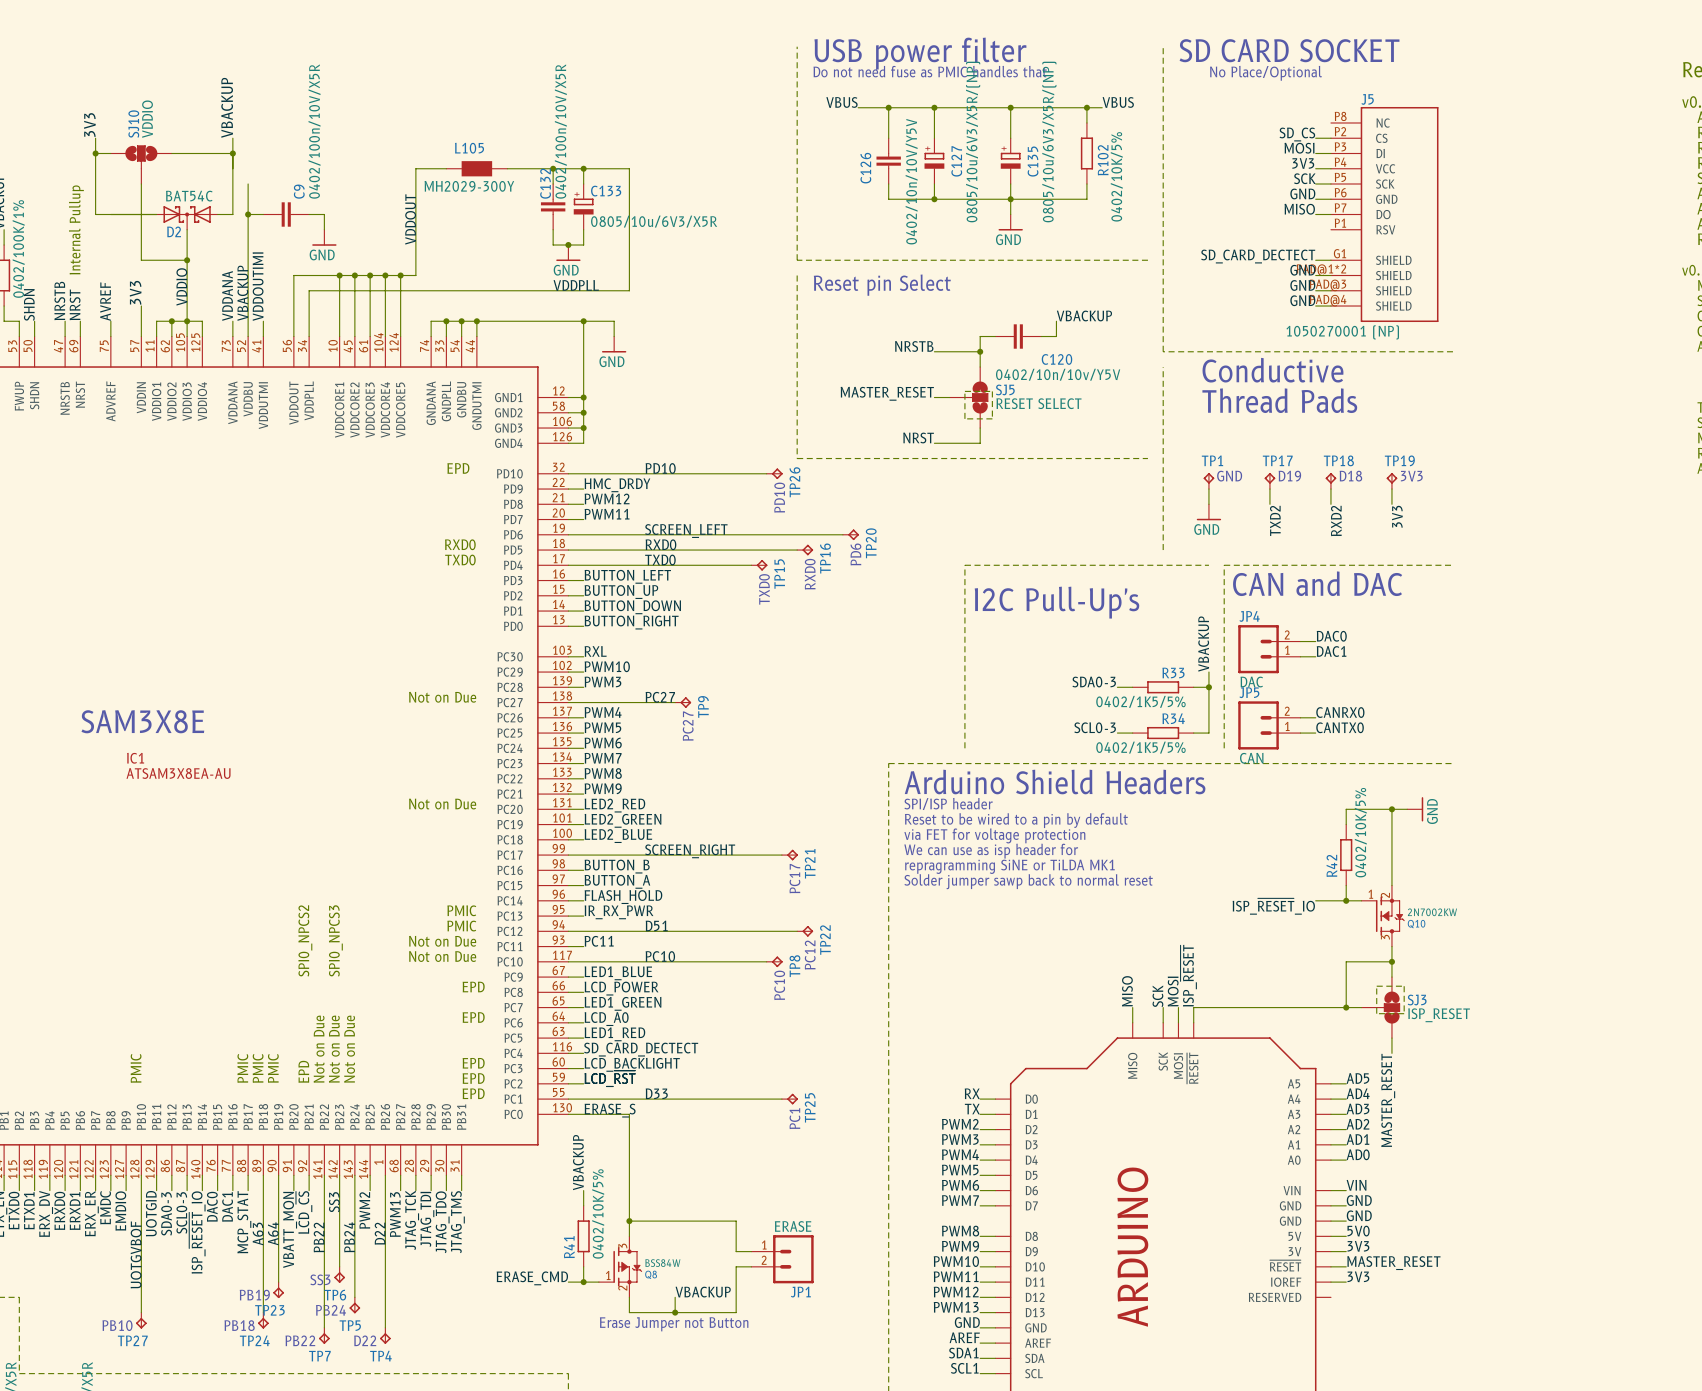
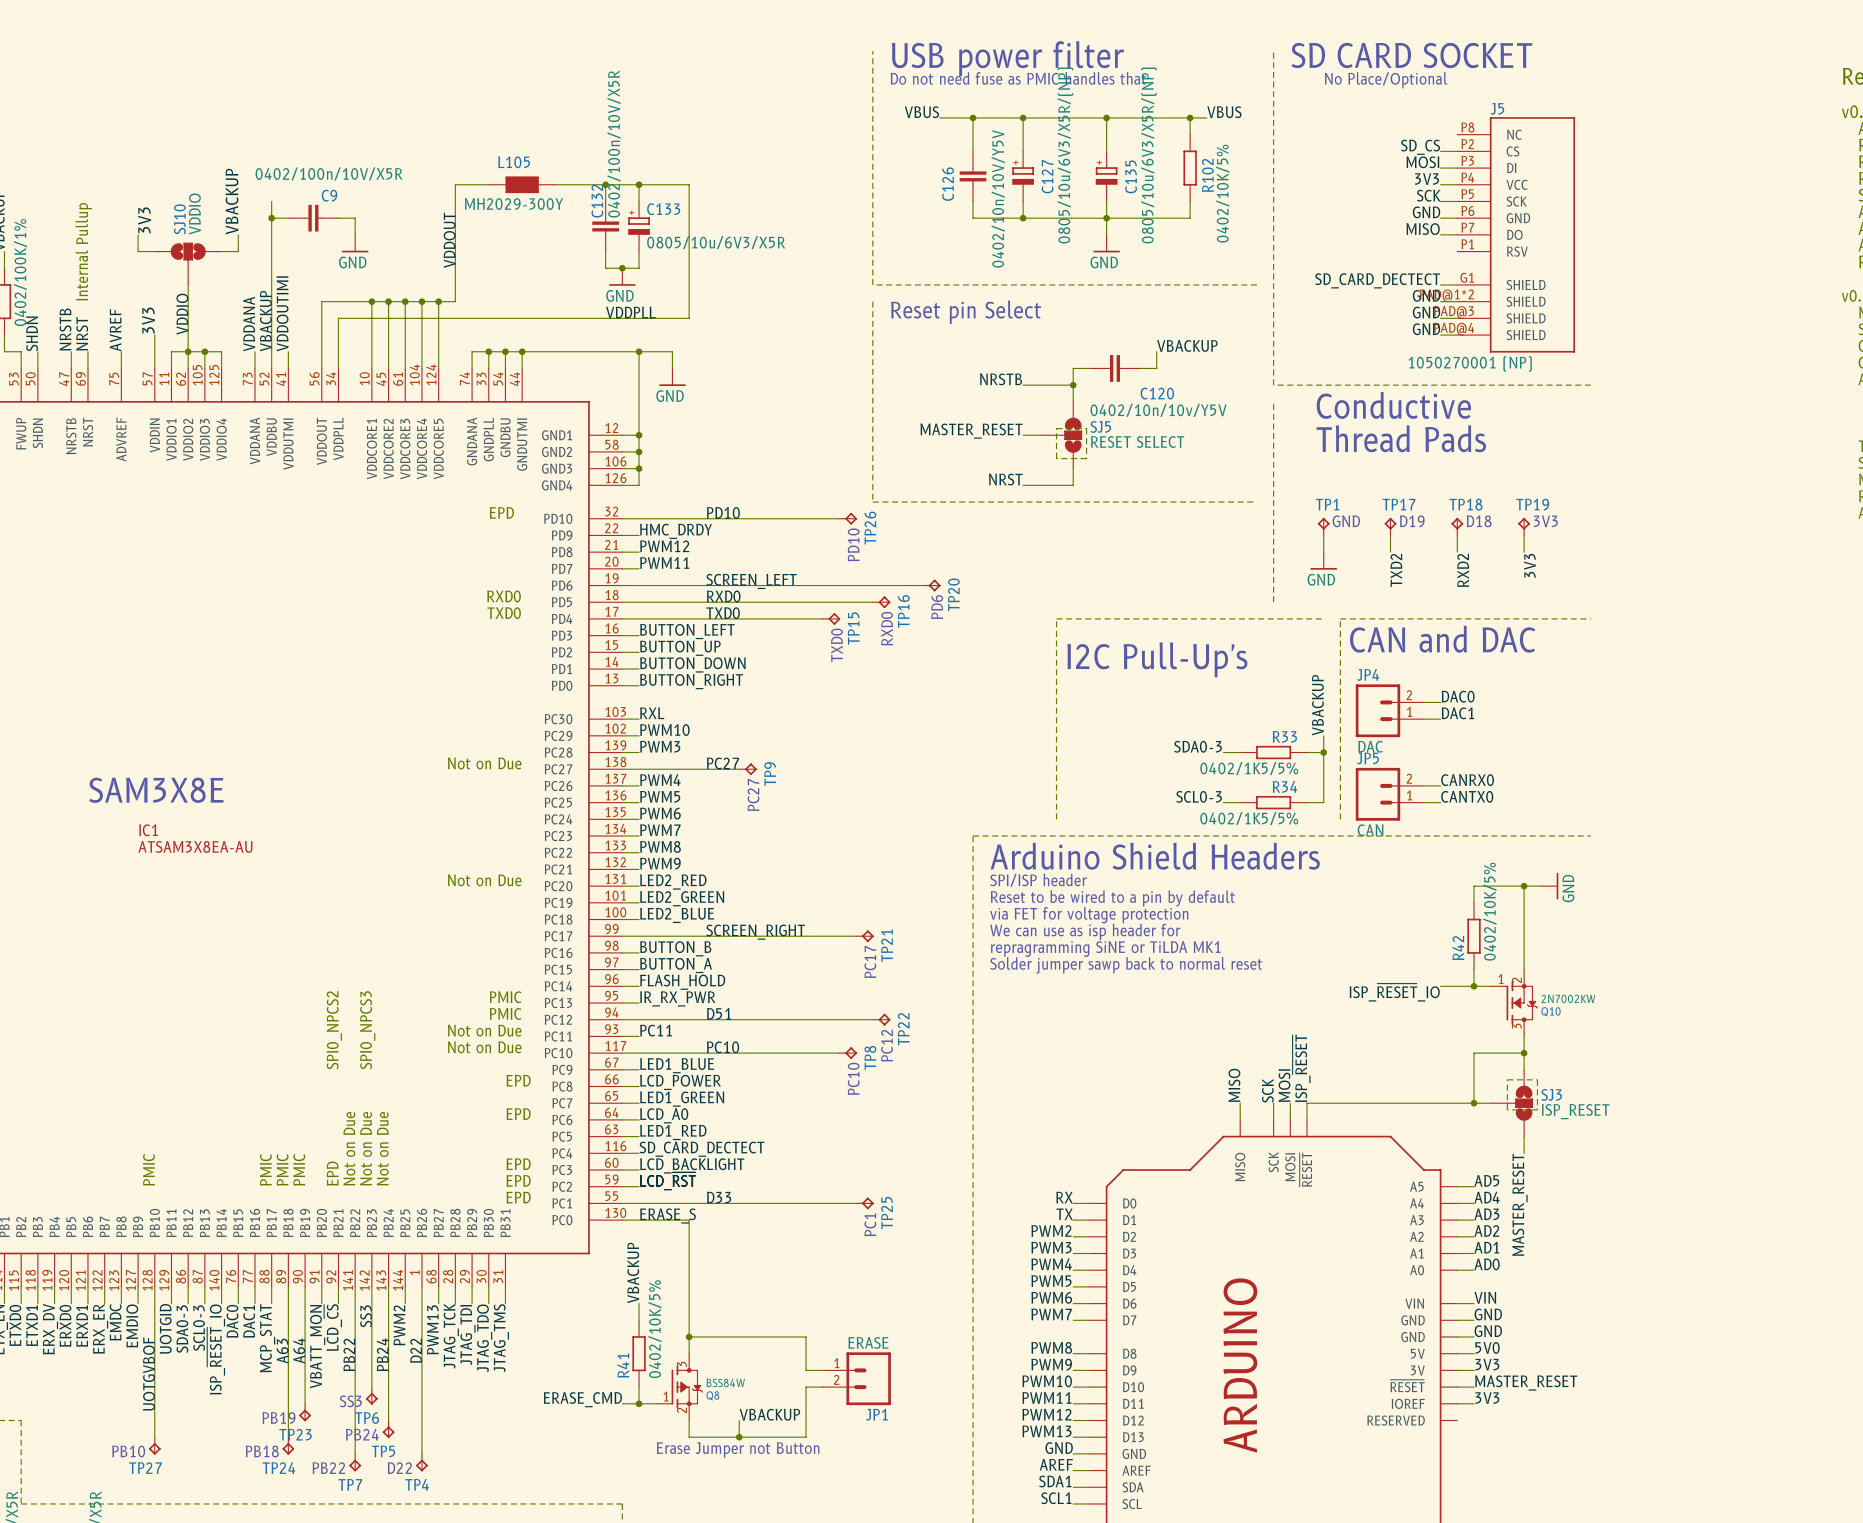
label position: VBACKUP (227, 107) -> VBACKUP (232, 201)
label position: 3V3 (89, 125) -> 3V3 (144, 220)
C9 value rotation: 0° (314, 131) -> 90° clockwise (329, 173)
wire: (95, 138) (95, 214) (156, 214) -> none
wire: (232, 138) (232, 214) (217, 214) -> (221, 251) (238, 251) (238, 234)
wire: (95, 153) (110, 153) -> none
junction: (95, 153) -> none
wire: (171, 153) (232, 153) -> none
junction: (232, 153) -> none
SJ10 position: (141, 164) -> (188, 263)
wire: (141, 184) (141, 260) (187, 260) -> none
C9 name rotation: 0° (299, 191) -> 90° clockwise (329, 195)
wire: none -> (138, 234) (138, 251) (154, 251)
wire: (248, 214) (263, 214) -> (271, 218) (288, 218)
junction position: (248, 214) -> (271, 218)
C9 position: (286, 214) -> (313, 218)
wire: (309, 214) (324, 214) (324, 229) -> (338, 218) (355, 218) (355, 234)
D2: BAT54C (187, 217) -> none
wire: (187, 229) (187, 321) -> none
power symbol position: GND (324, 237) -> GND (355, 243)
wire: none -> (188, 284) (188, 351)
junction: (187, 260) -> none
label position: VDDIO (181, 286) -> VDDIO (182, 314)

